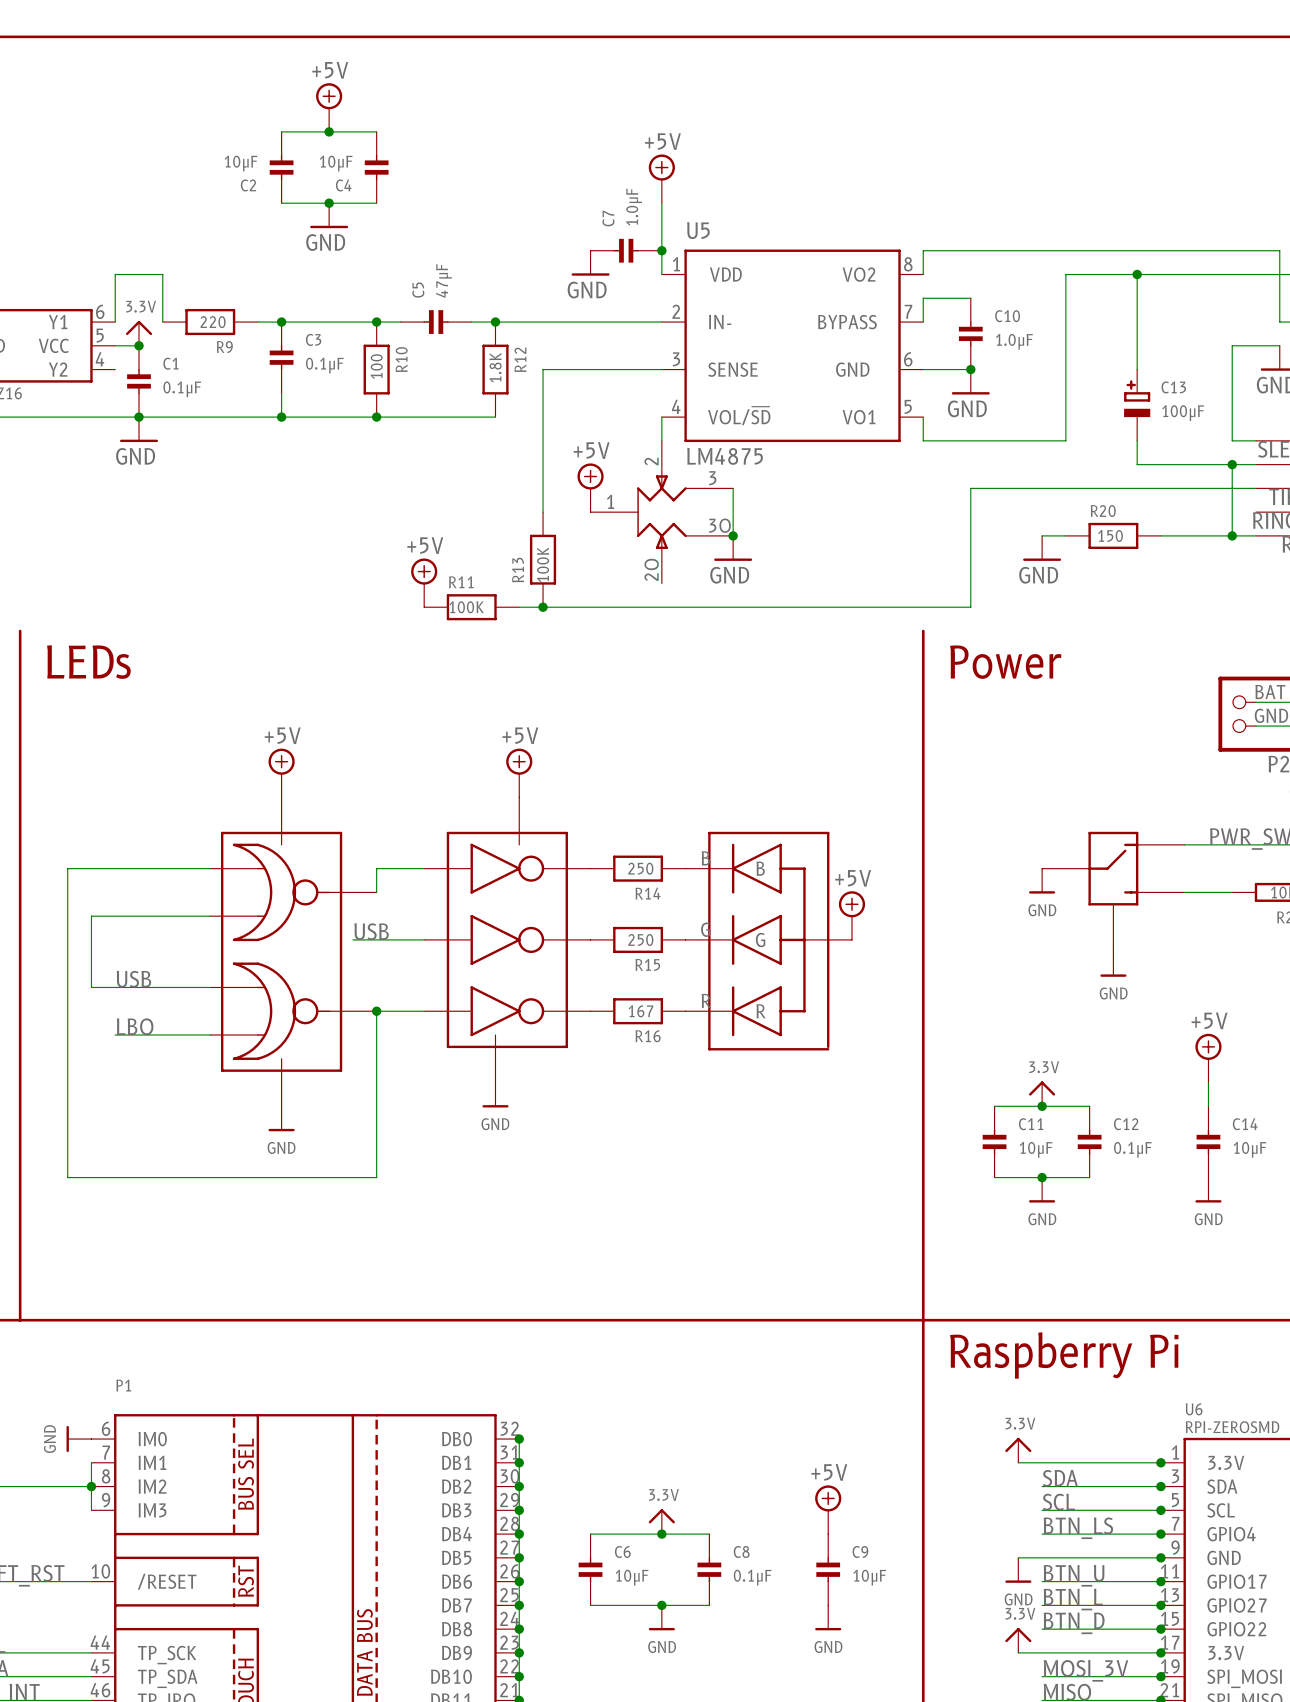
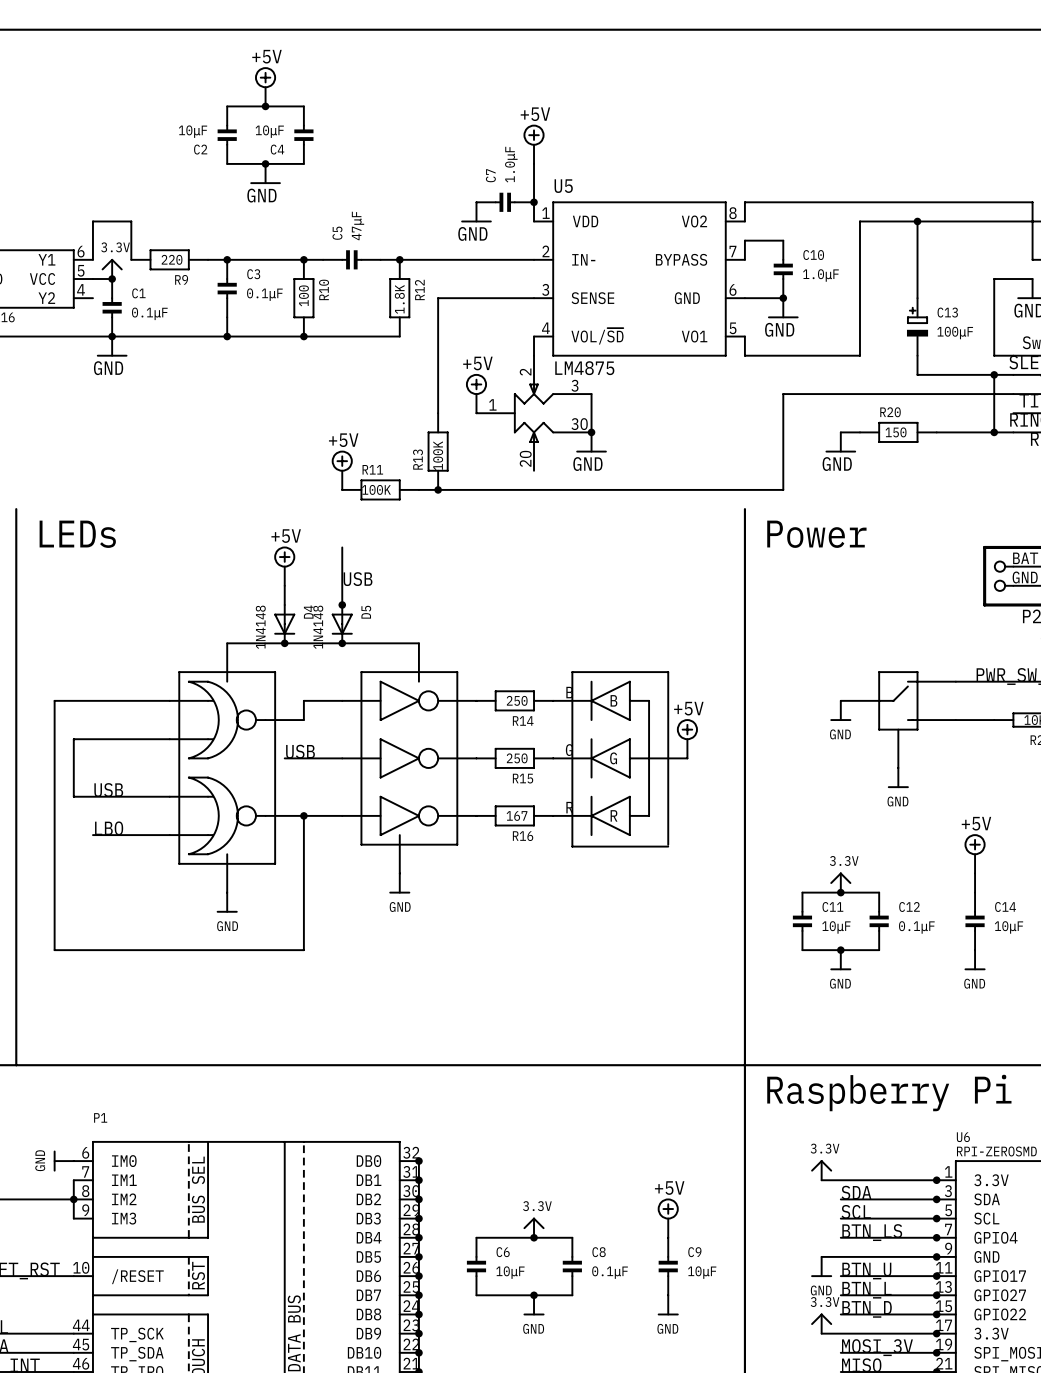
wire: none -> (342, 547) (342, 604)
power symbol: none -> +5V (284, 566)
label: none -> USB (358, 579)
wire: none -> (284, 585) (284, 604)
junction: none -> (342, 604)
power symbol: +5V (281, 772) -> none
power symbol: +5V (519, 772) -> none
D4: none -> 1N4148 (284, 624)
D5: none -> 1N4148 (342, 624)
wire: none -> (227, 643) (418, 643)
junction: none -> (284, 643)
junction: none -> (342, 643)

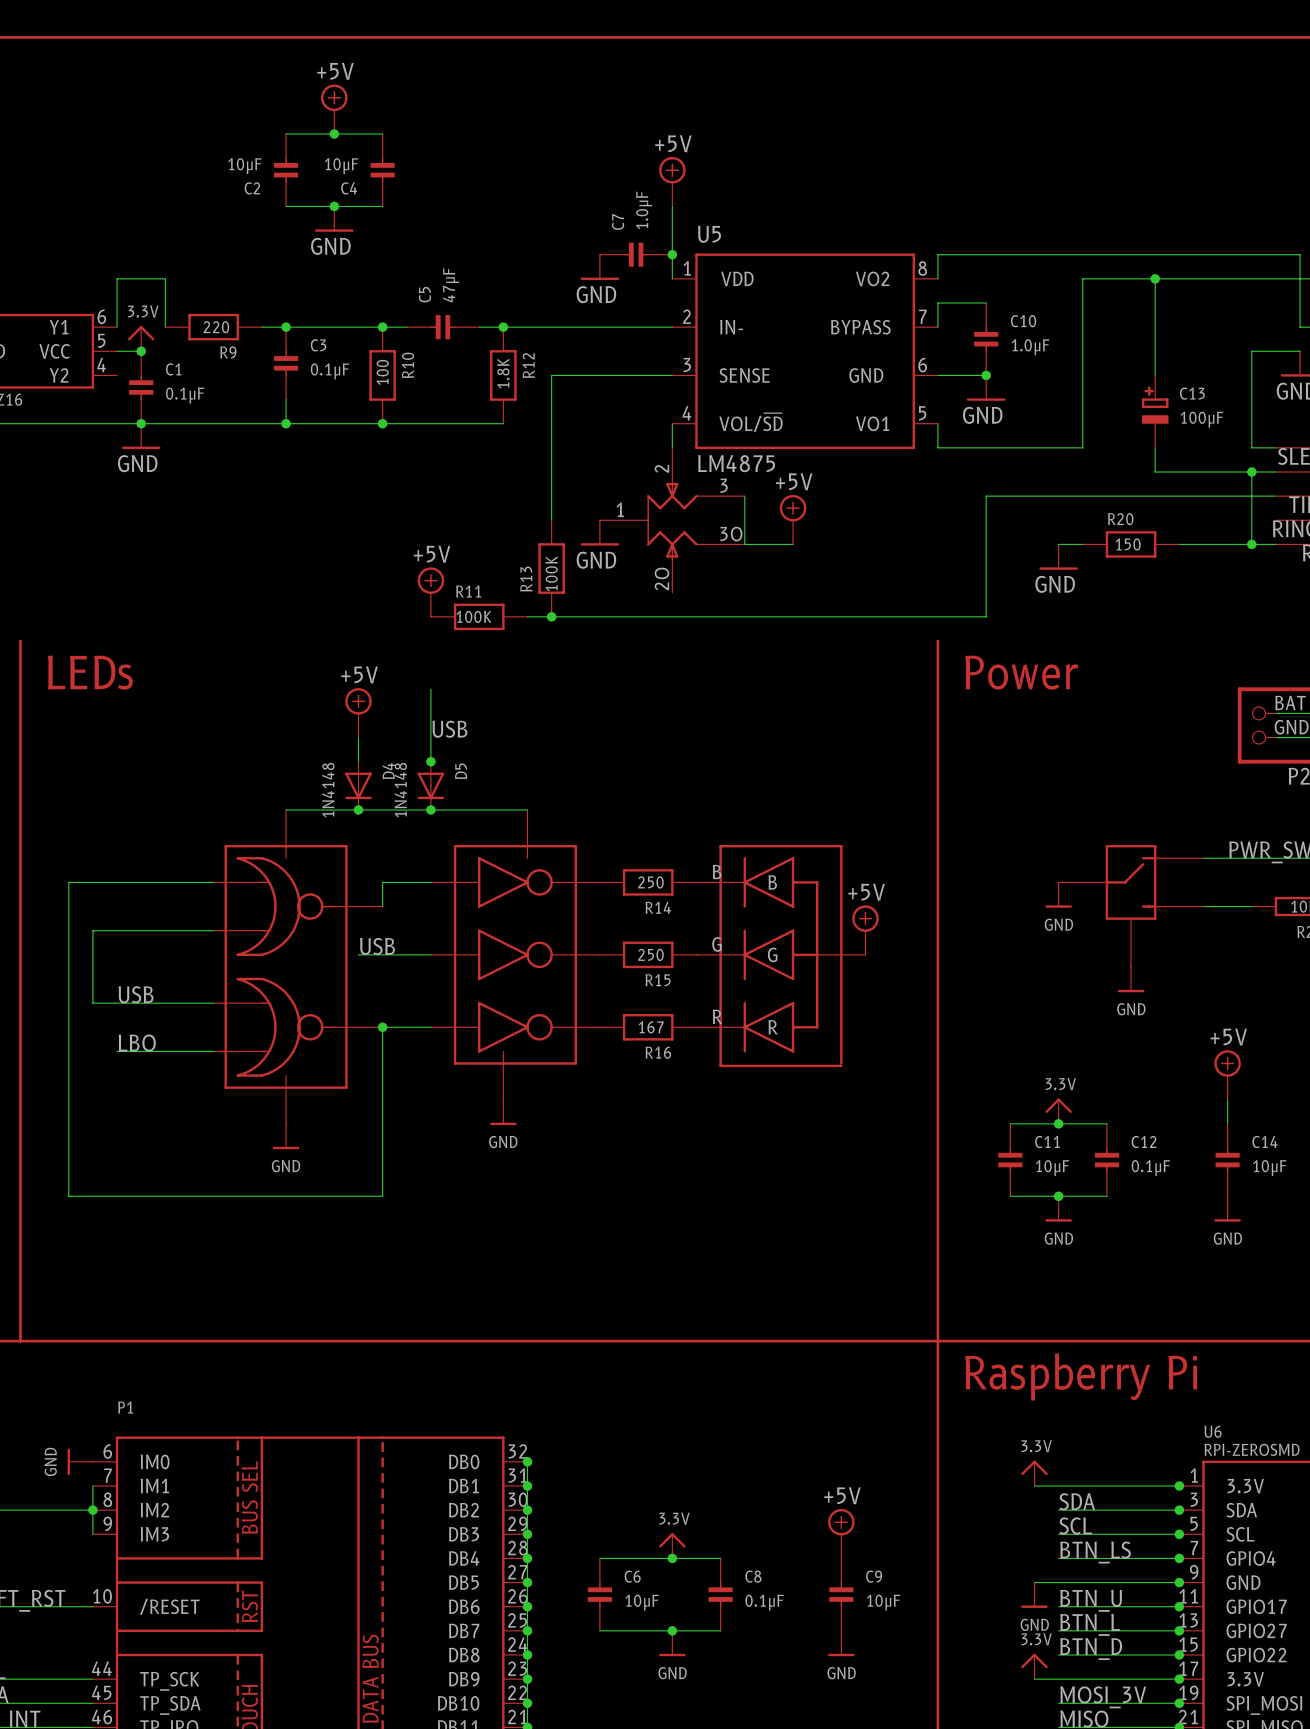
power symbol position: +5V (476, 393) -> +5V (793, 519)
wire: none -> (744, 544) (793, 544)
junction: (591, 432) -> none
power symbol position: GND (591, 442) -> GND (599, 532)

